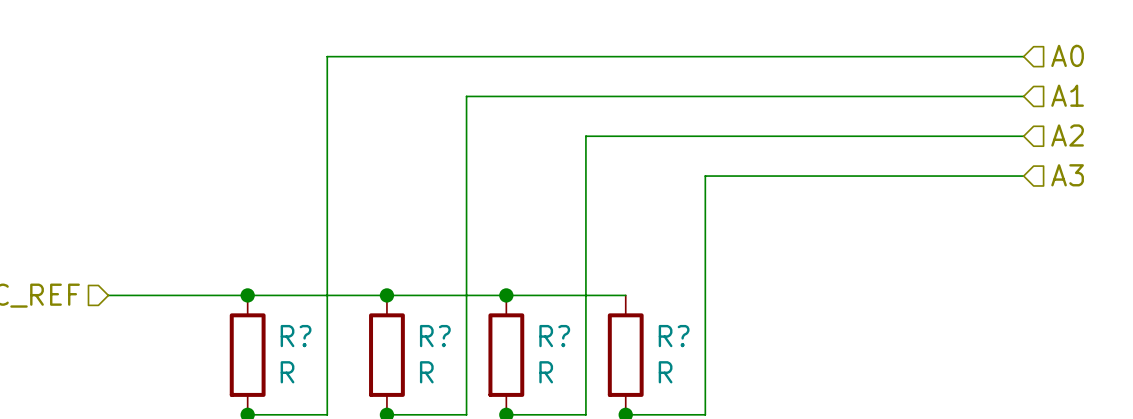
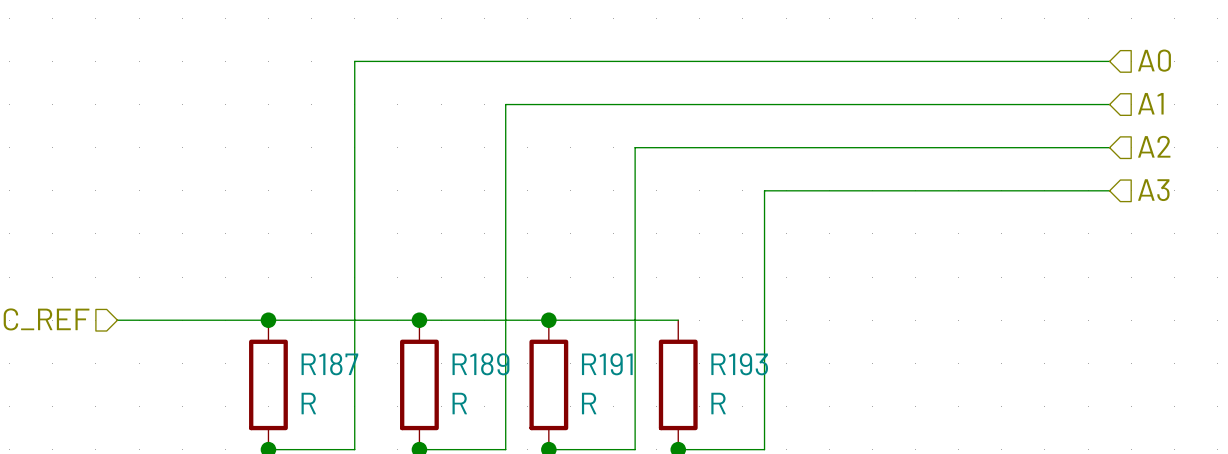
R? name: R? (296, 336) -> R187 (329, 364)
R? name: R? (435, 336) -> R189 (480, 364)
R? name: R? (554, 336) -> R191 (607, 364)
R? name: R? (674, 336) -> R193 (739, 364)

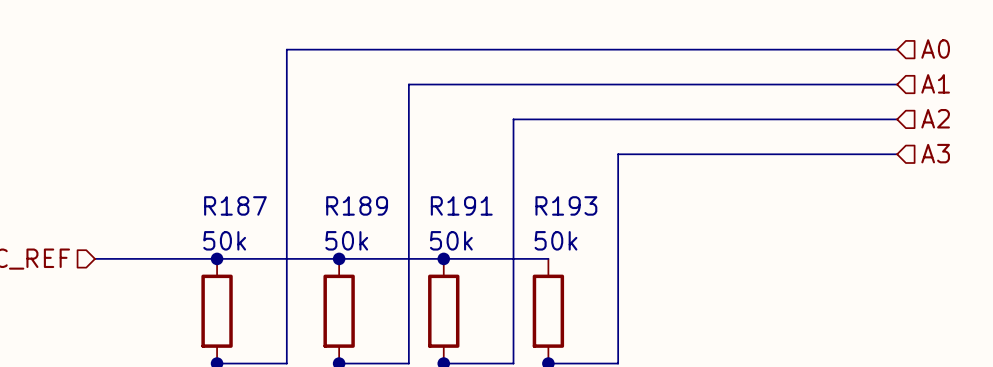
R187 name position: R187 (329, 364) -> R187 (235, 205)
R189 name position: R189 (480, 364) -> R189 (357, 205)
R191 name position: R191 (607, 364) -> R191 (461, 205)
R193 name position: R193 (739, 364) -> R193 (566, 205)
R187 value: R (308, 403) -> 50k (224, 240)
R189 value: R (459, 403) -> 50k (346, 240)
R191 value: R (589, 403) -> 50k (451, 240)
R193 value: R (718, 403) -> 50k (555, 240)

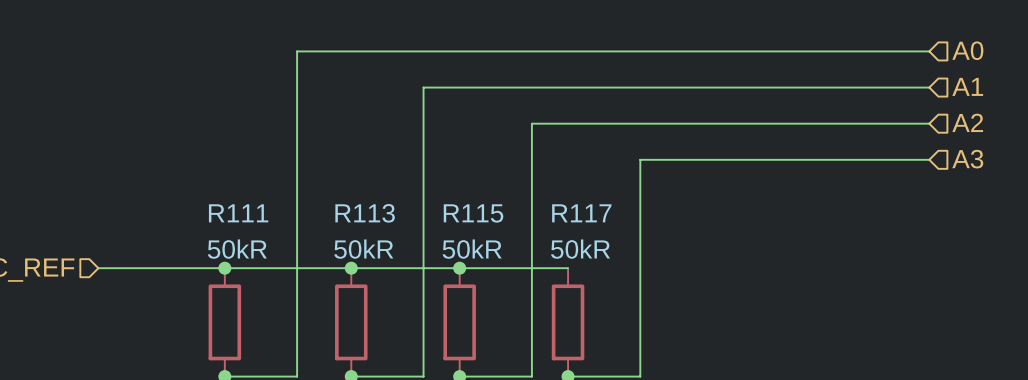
R187 name: R187 (235, 205) -> R111 (238, 213)
R189 name: R189 (357, 205) -> R113 (365, 213)
R191 name: R191 (461, 205) -> R115 (473, 213)
R193 name: R193 (566, 205) -> R117 (581, 213)
R187 value: 50k (224, 240) -> 50kR (237, 249)
R189 value: 50k (346, 240) -> 50kR (363, 249)
R191 value: 50k (451, 240) -> 50kR (472, 249)
R193 value: 50k (555, 240) -> 50kR (580, 249)

